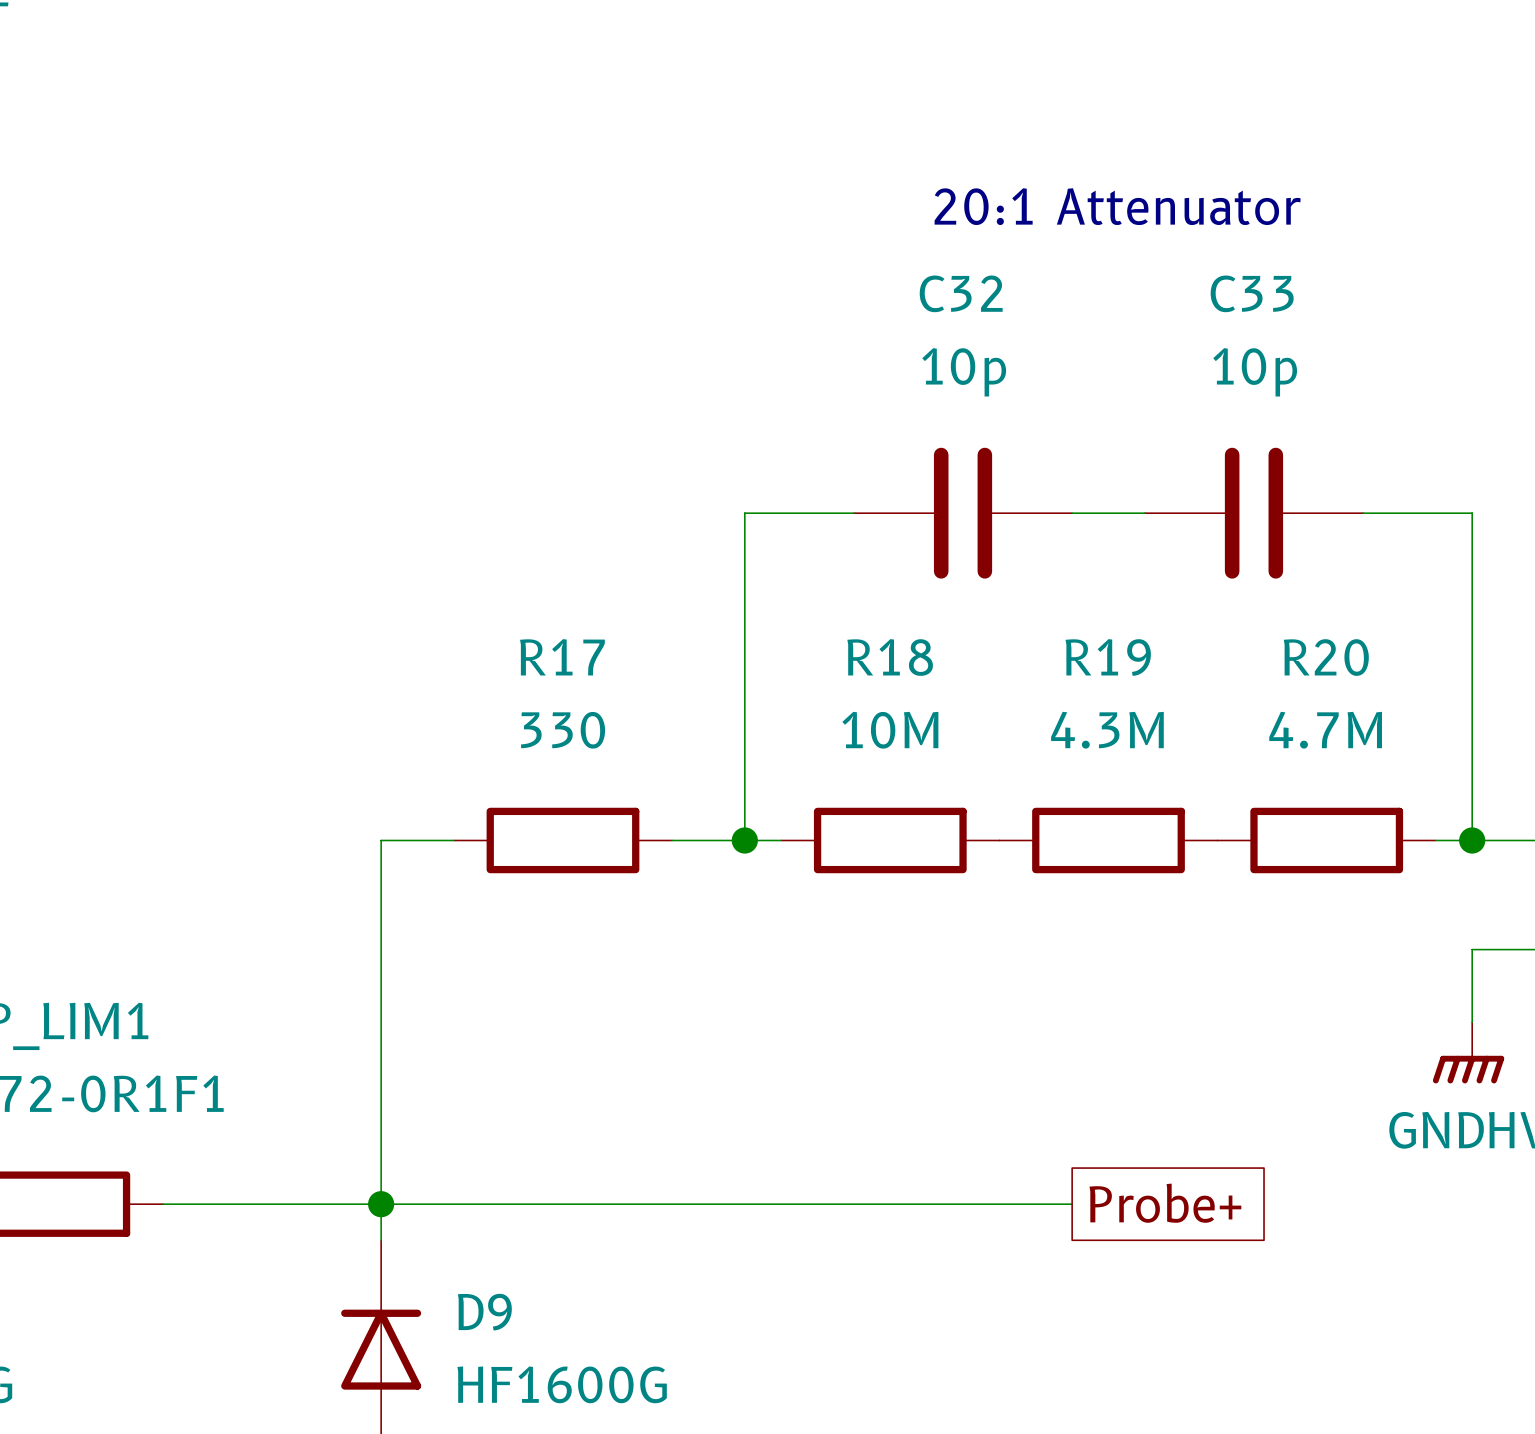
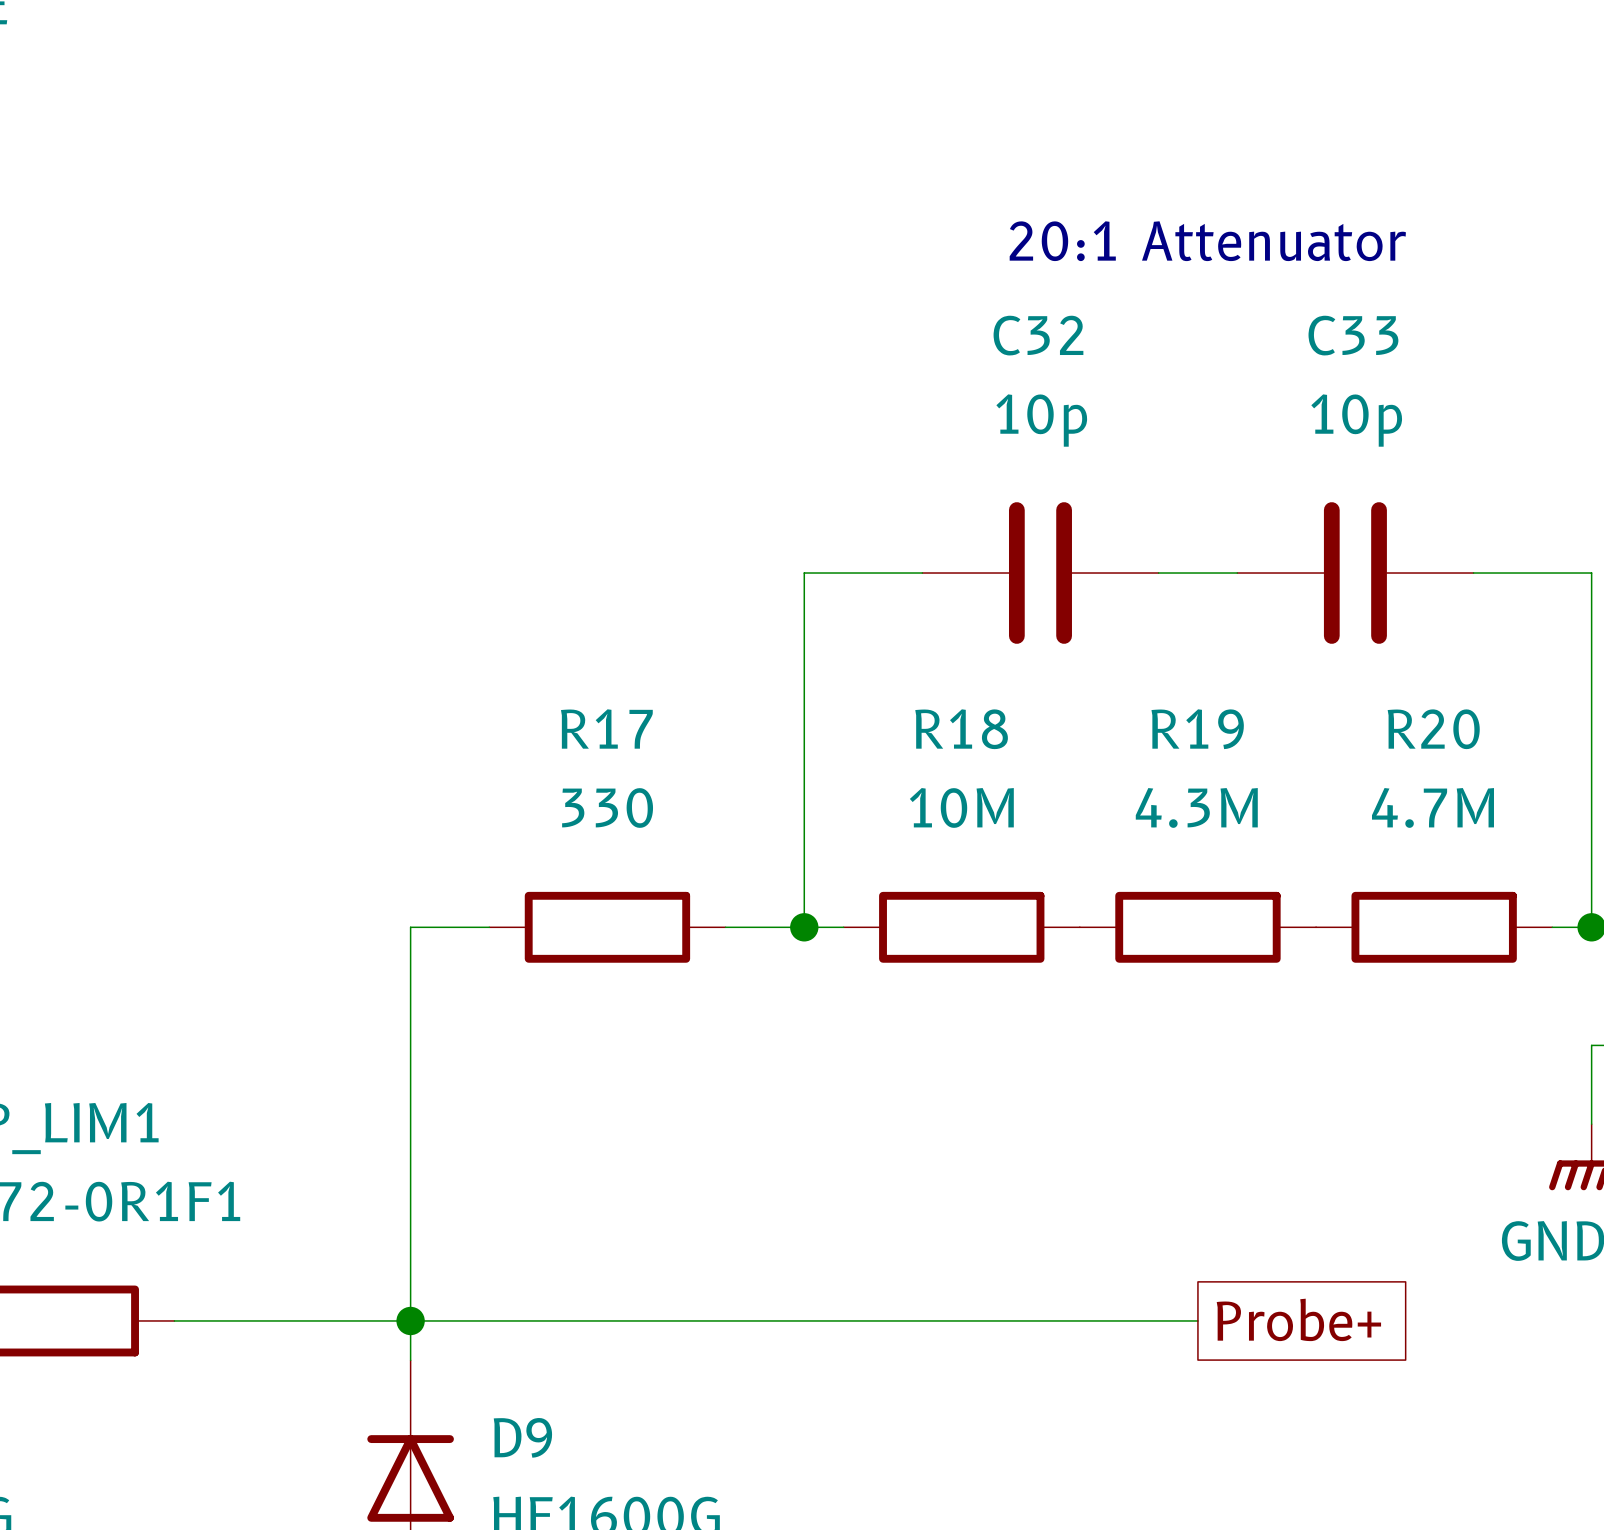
global label position: Probe+ (1165, 1203) -> Probe+ (1298, 1319)
wire: none -> (1158, 1320) (1197, 1320)

